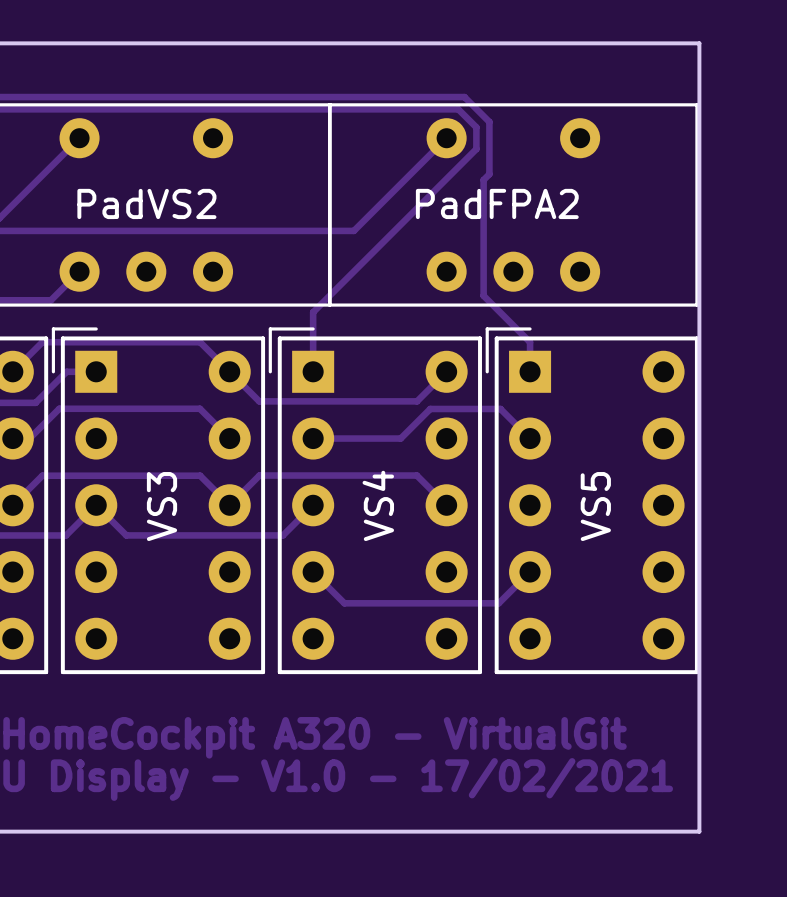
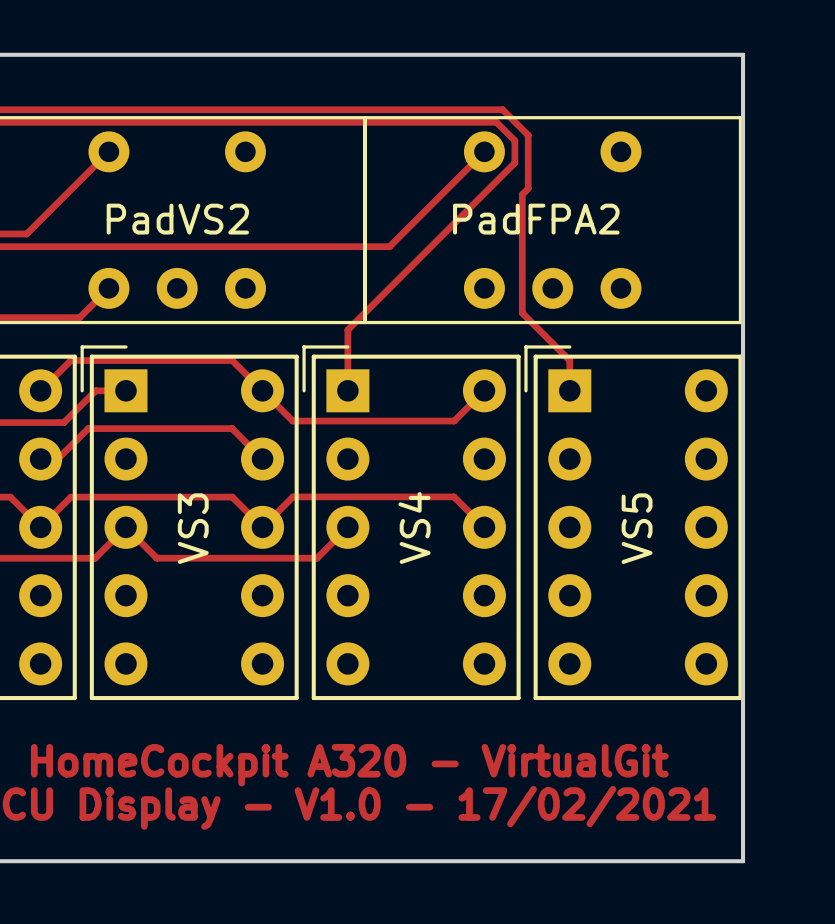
track: (313, 438) (400, 438) (430, 408) (500, 408) (530, 438) -> none
track: (313, 572) (344, 603) (498, 603) (530, 572) -> none

